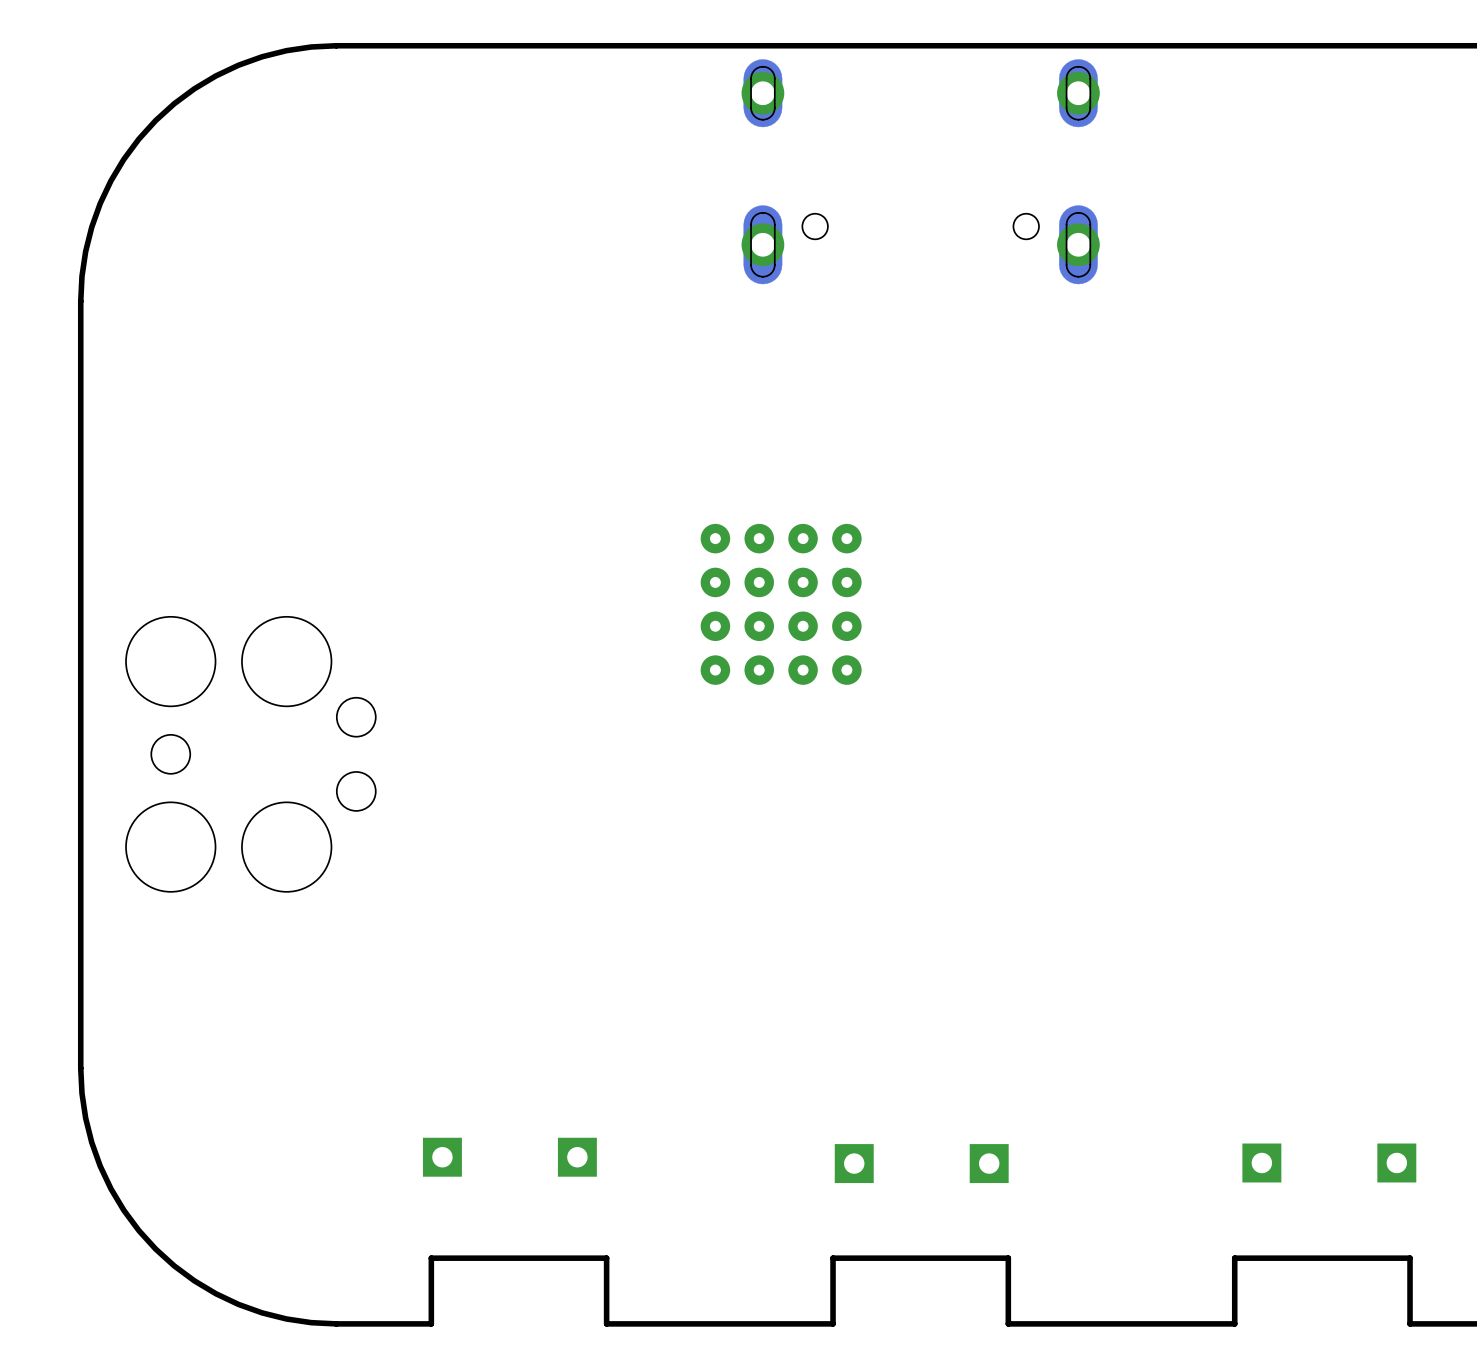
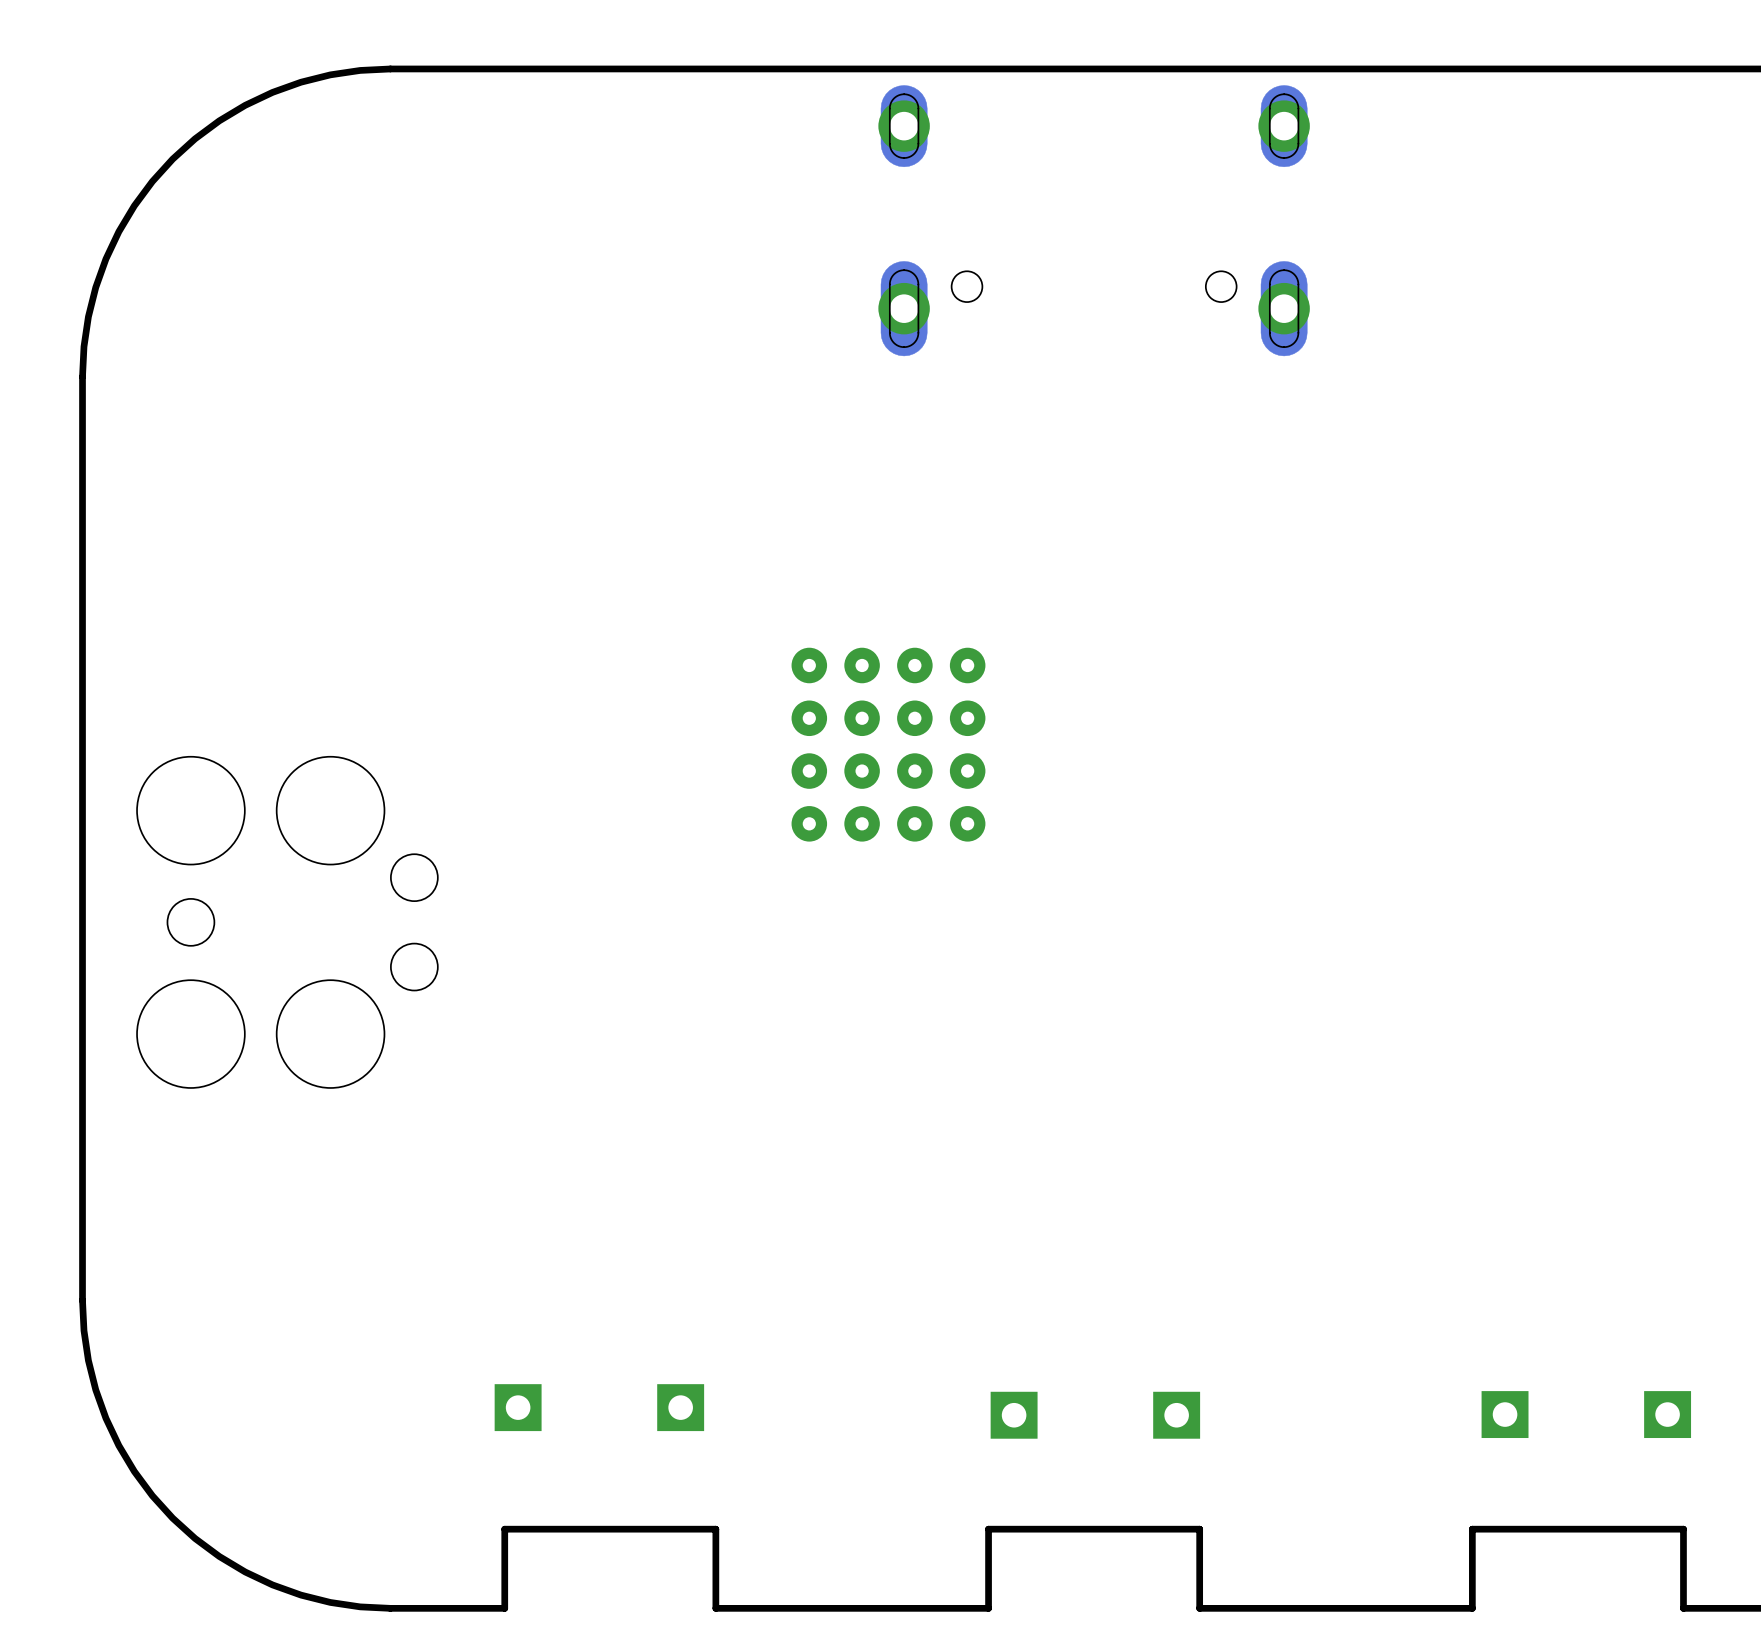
part position: (781, 604) -> (888, 744)

